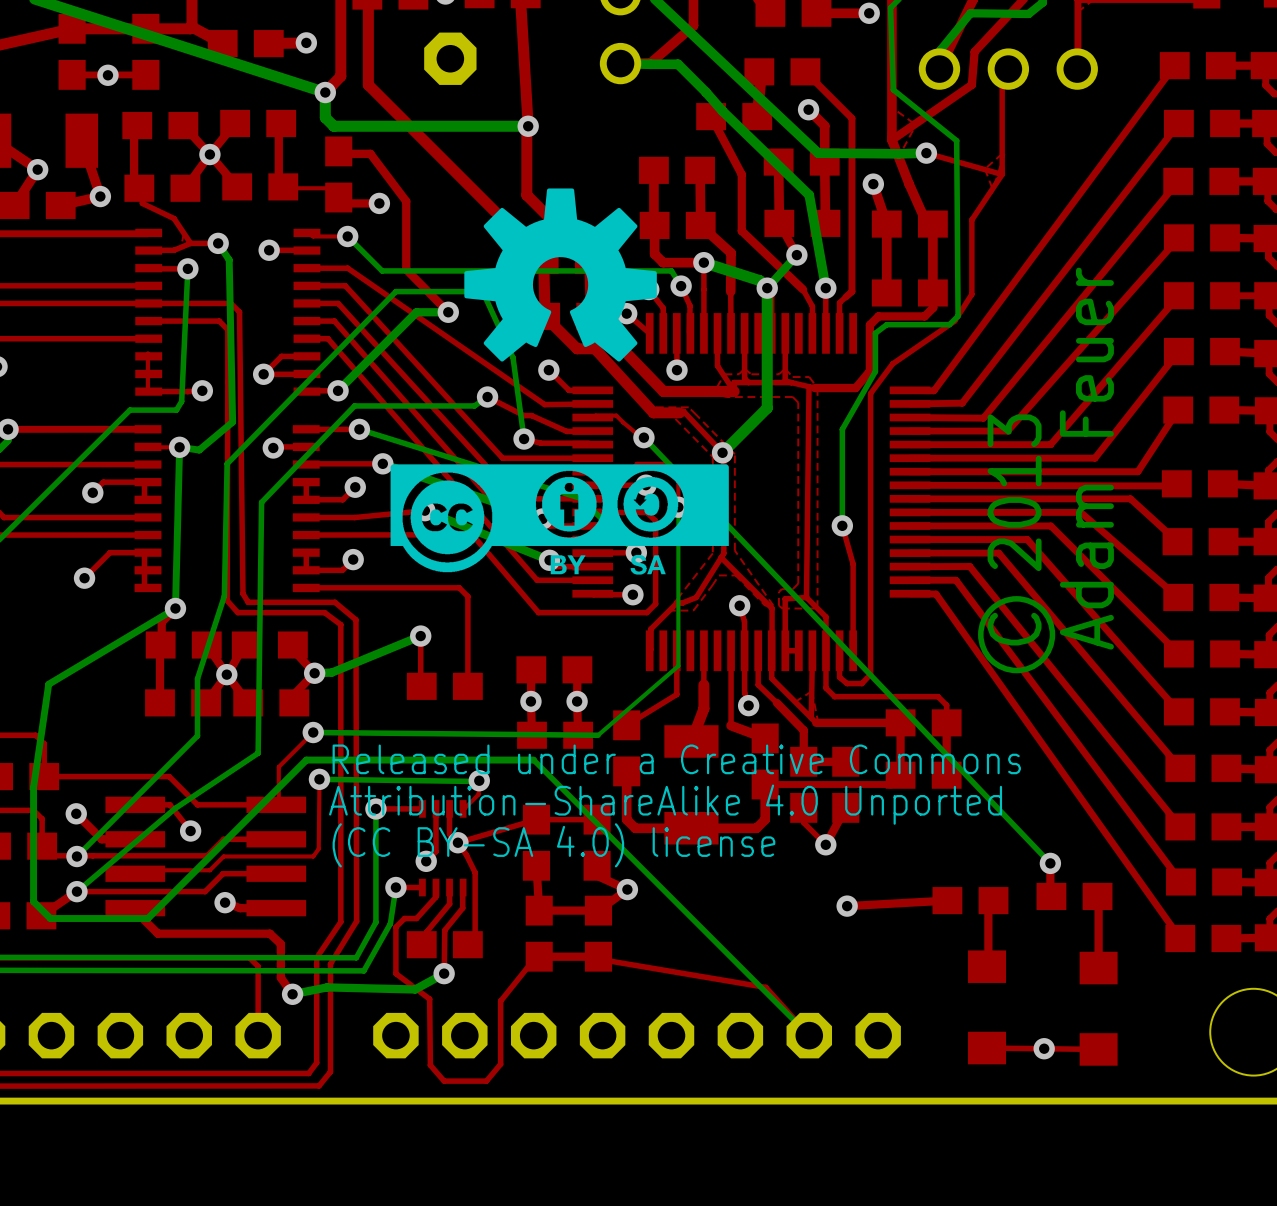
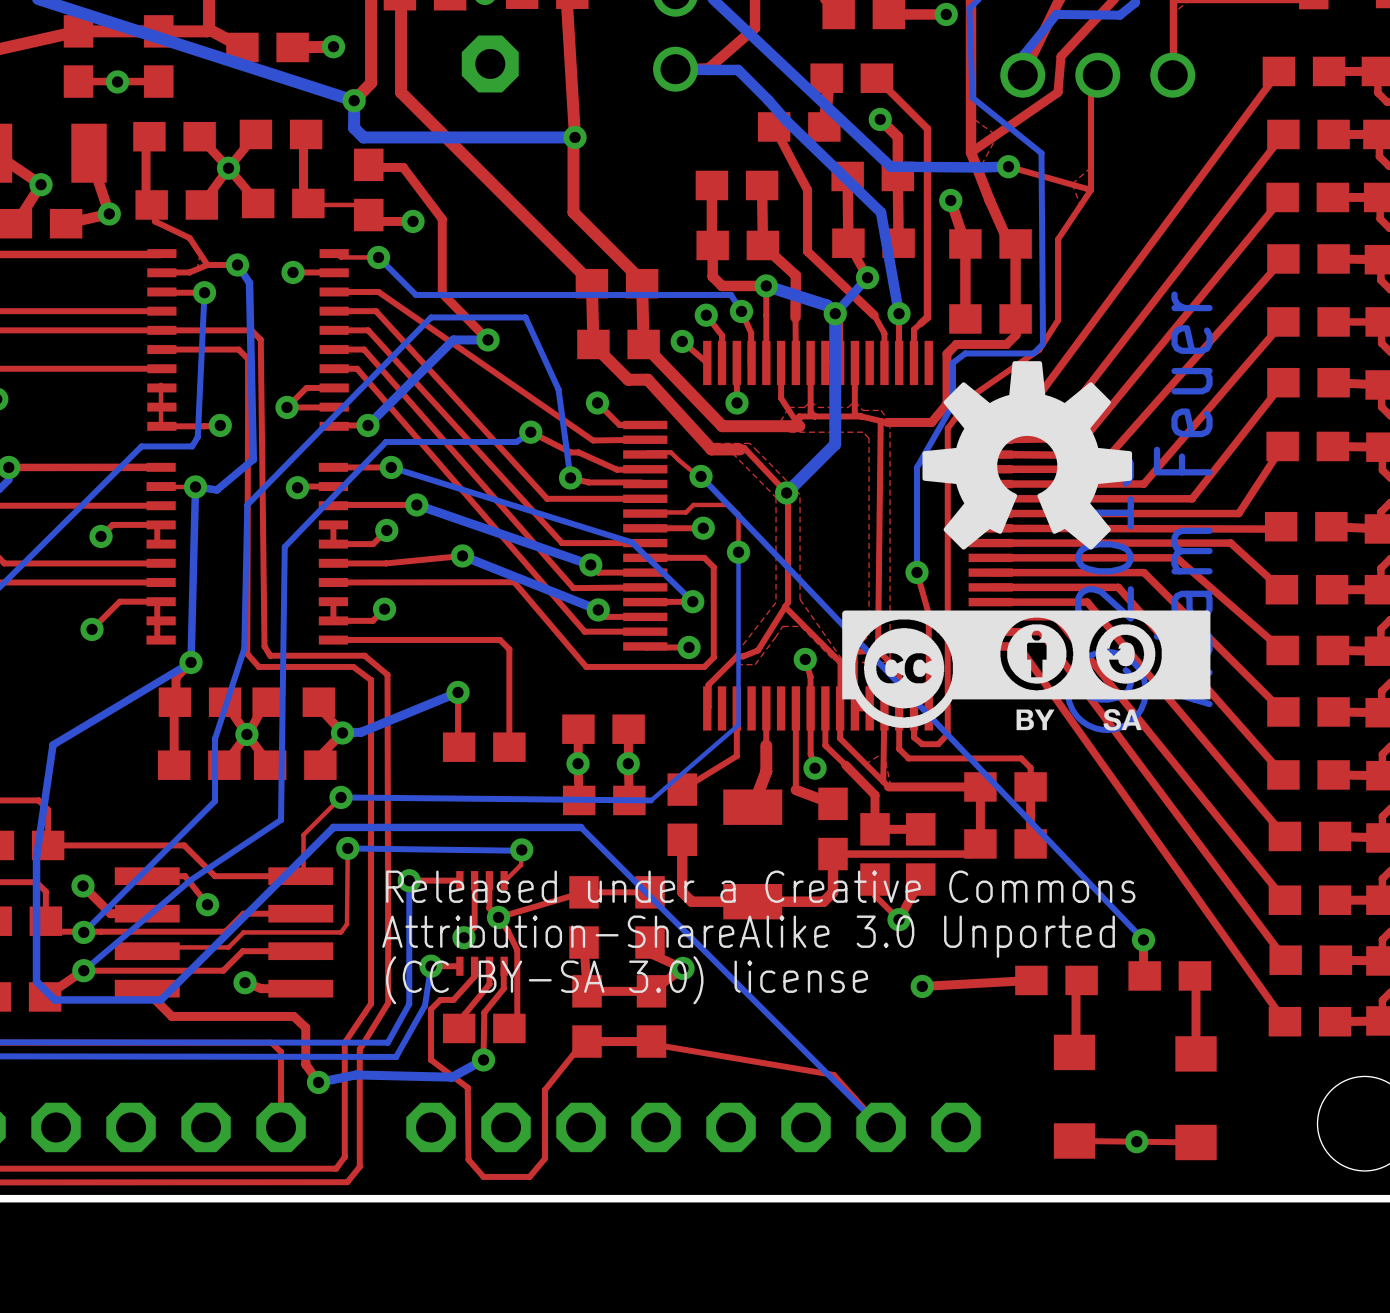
drawing position: (560, 275) -> (1027, 455)
drawing position: (559, 519) -> (1026, 670)
text position: Released under a Creative Commons (676, 759) -> Released under a Creative Commons (760, 886)
text: Attribution-ShareAlike 4.0 Unported (665, 804) -> Attribution-ShareAlike 3.0 Unported (748, 936)
text: (CC BY-SA 4.0) license (553, 845) -> (CC BY-SA 3.0) license (627, 980)

